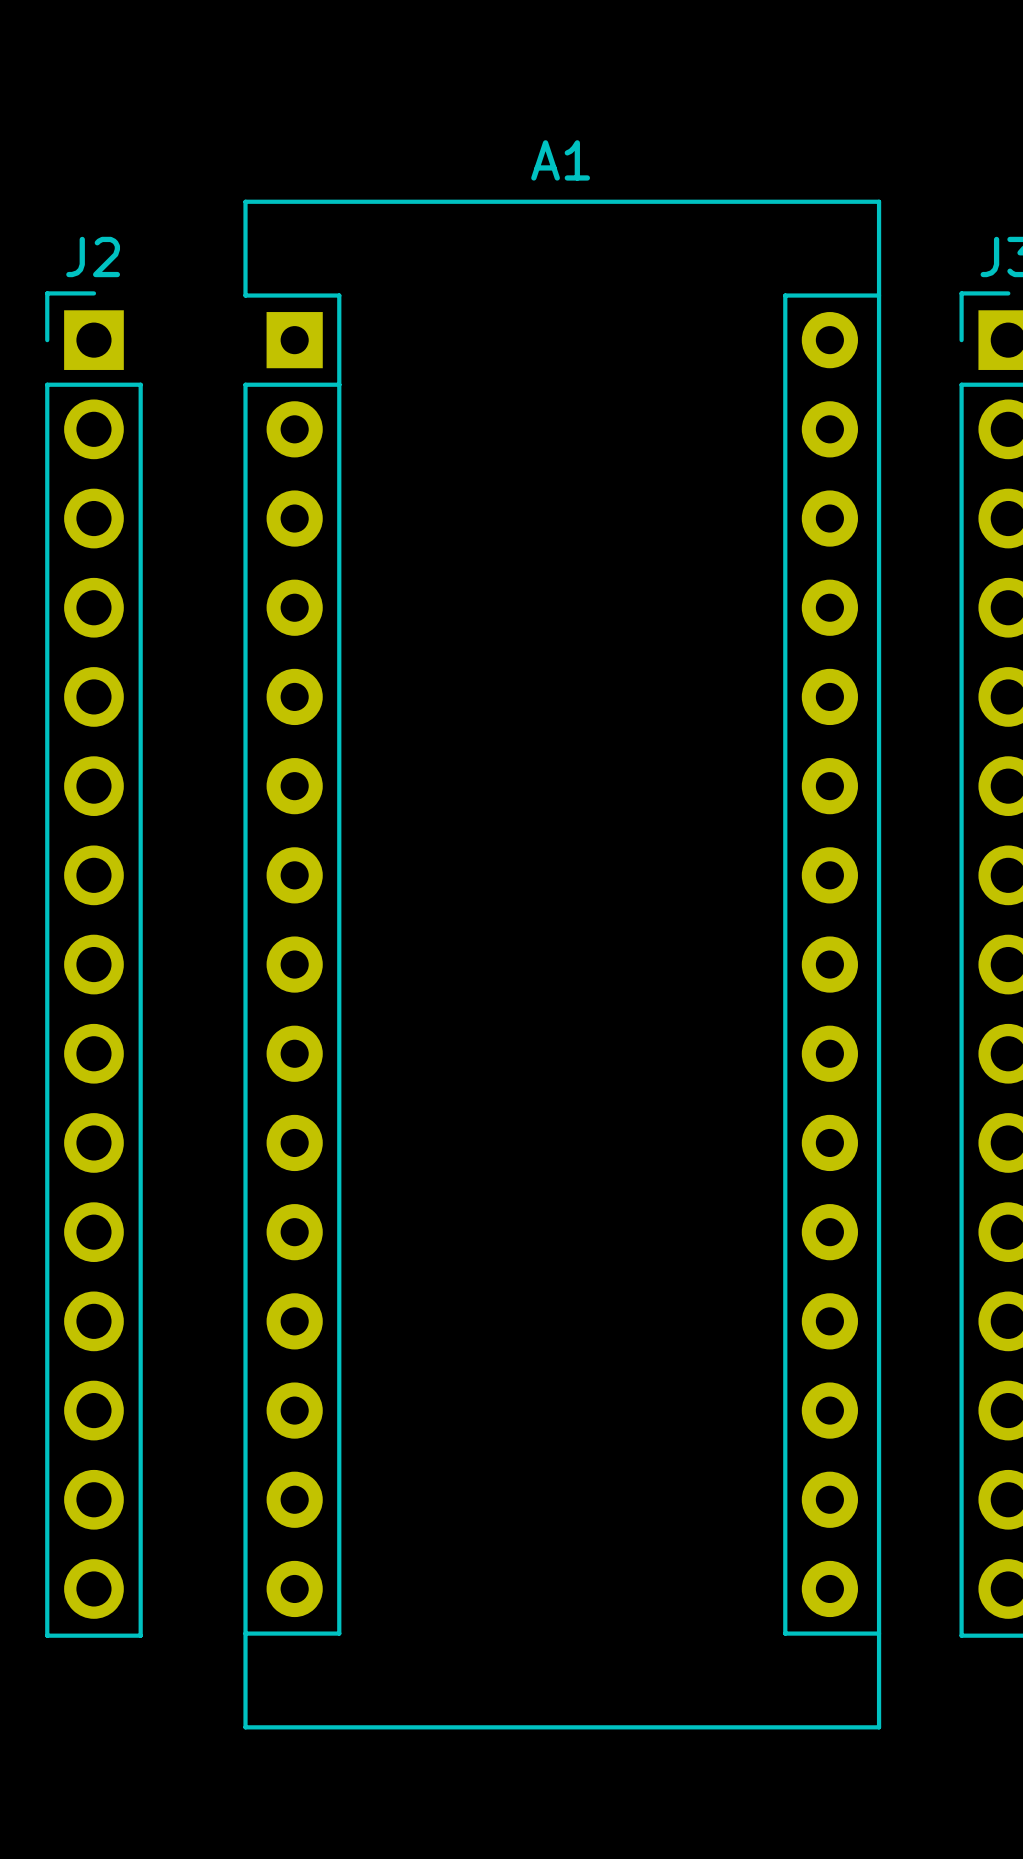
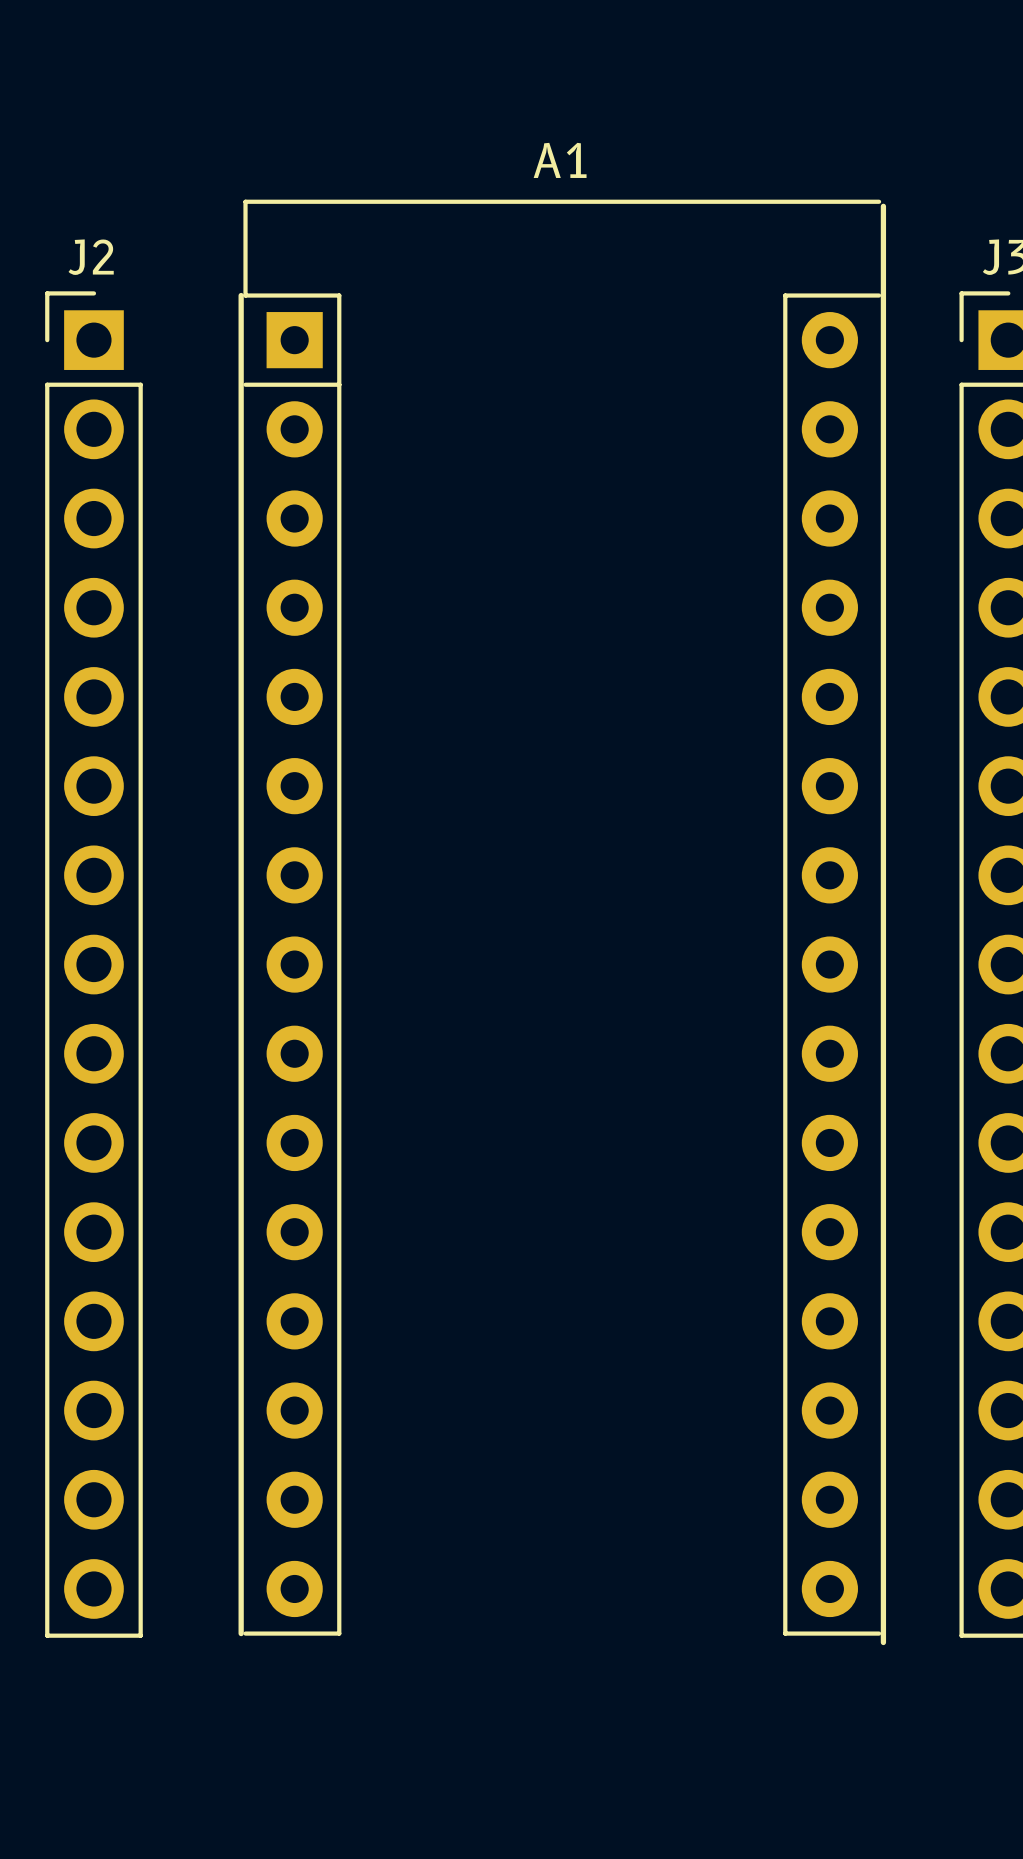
A1 footprint: [243, 199, 882, 1730] -> [238, 199, 887, 1646]

